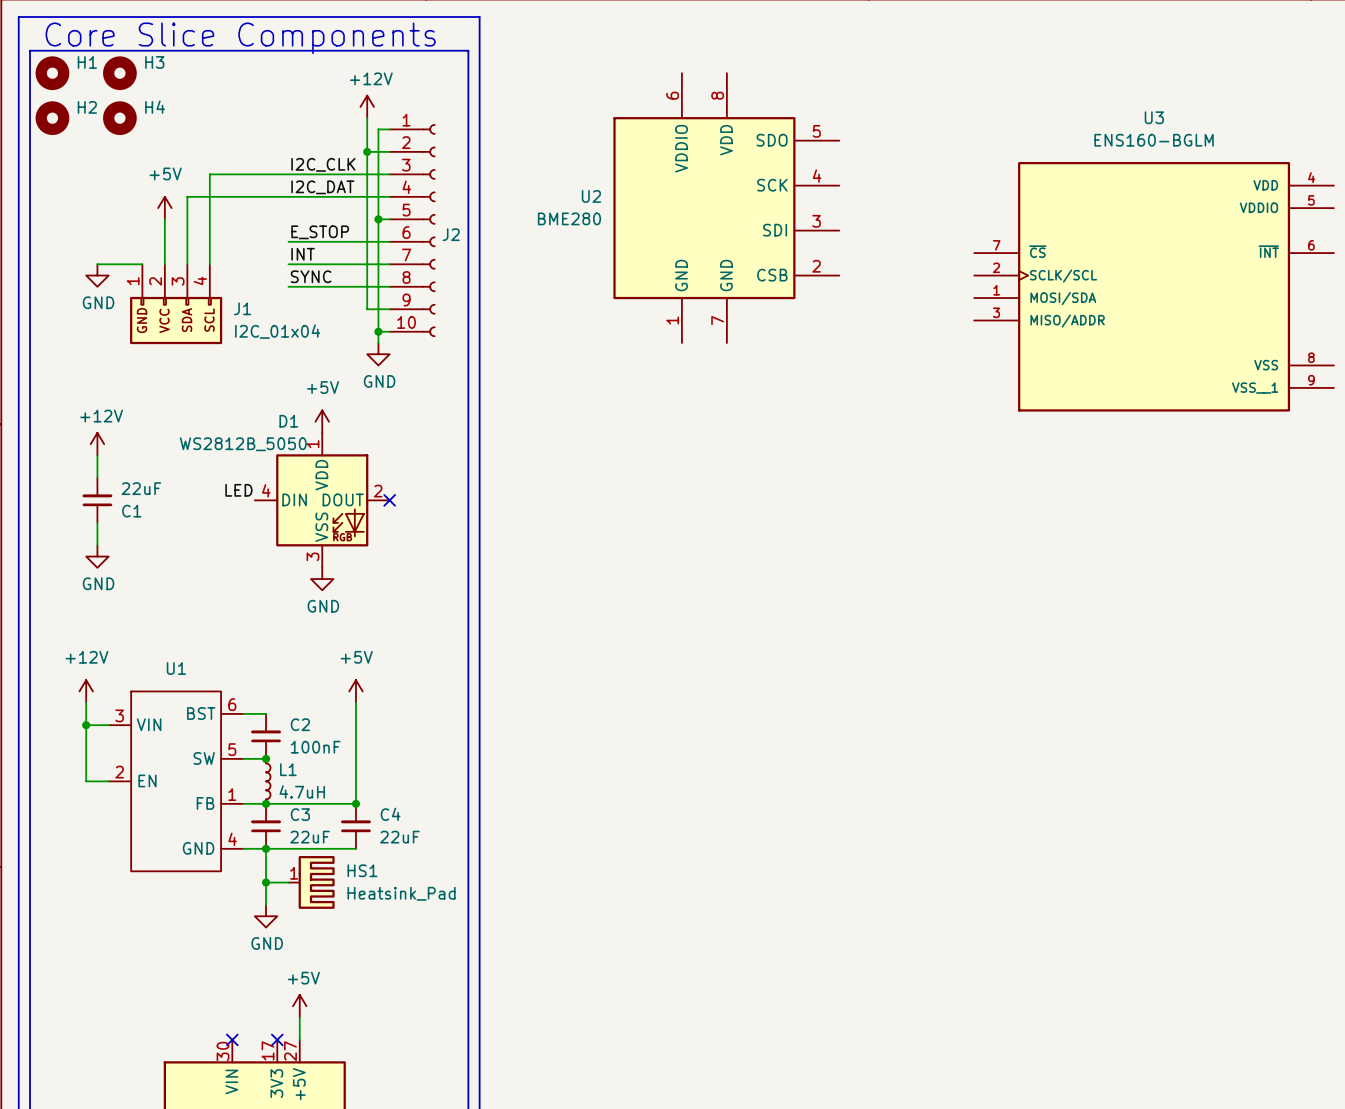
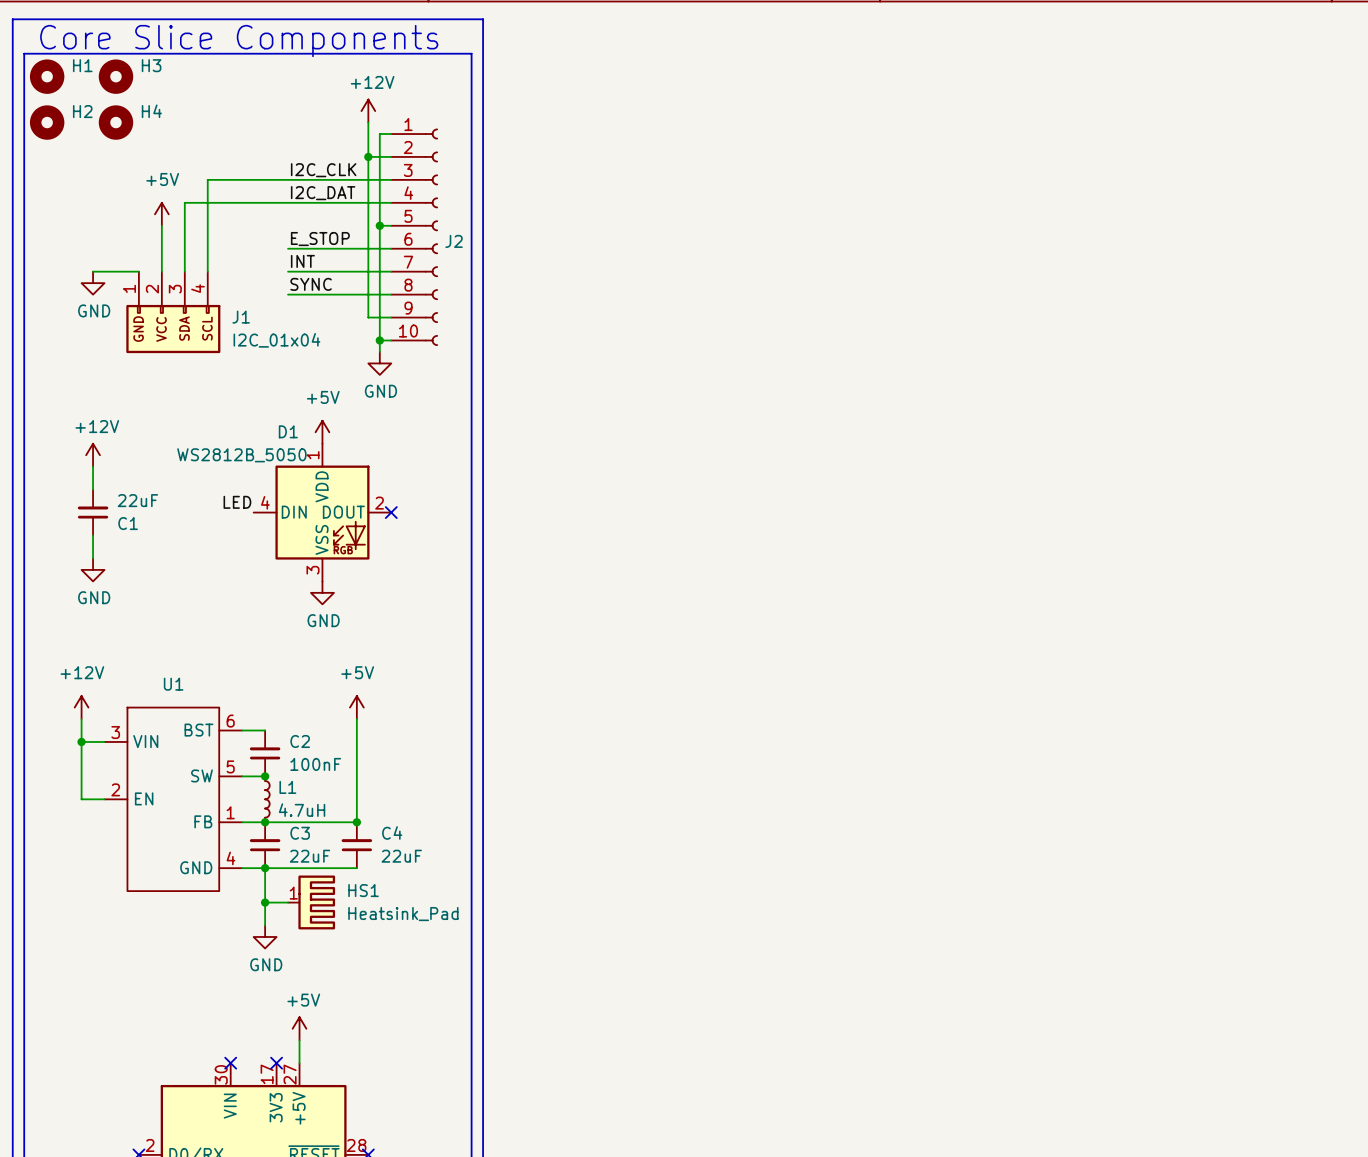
U2: BME280 (726, 208) -> none
U3: ENS160-BGLM (1154, 286) -> none

